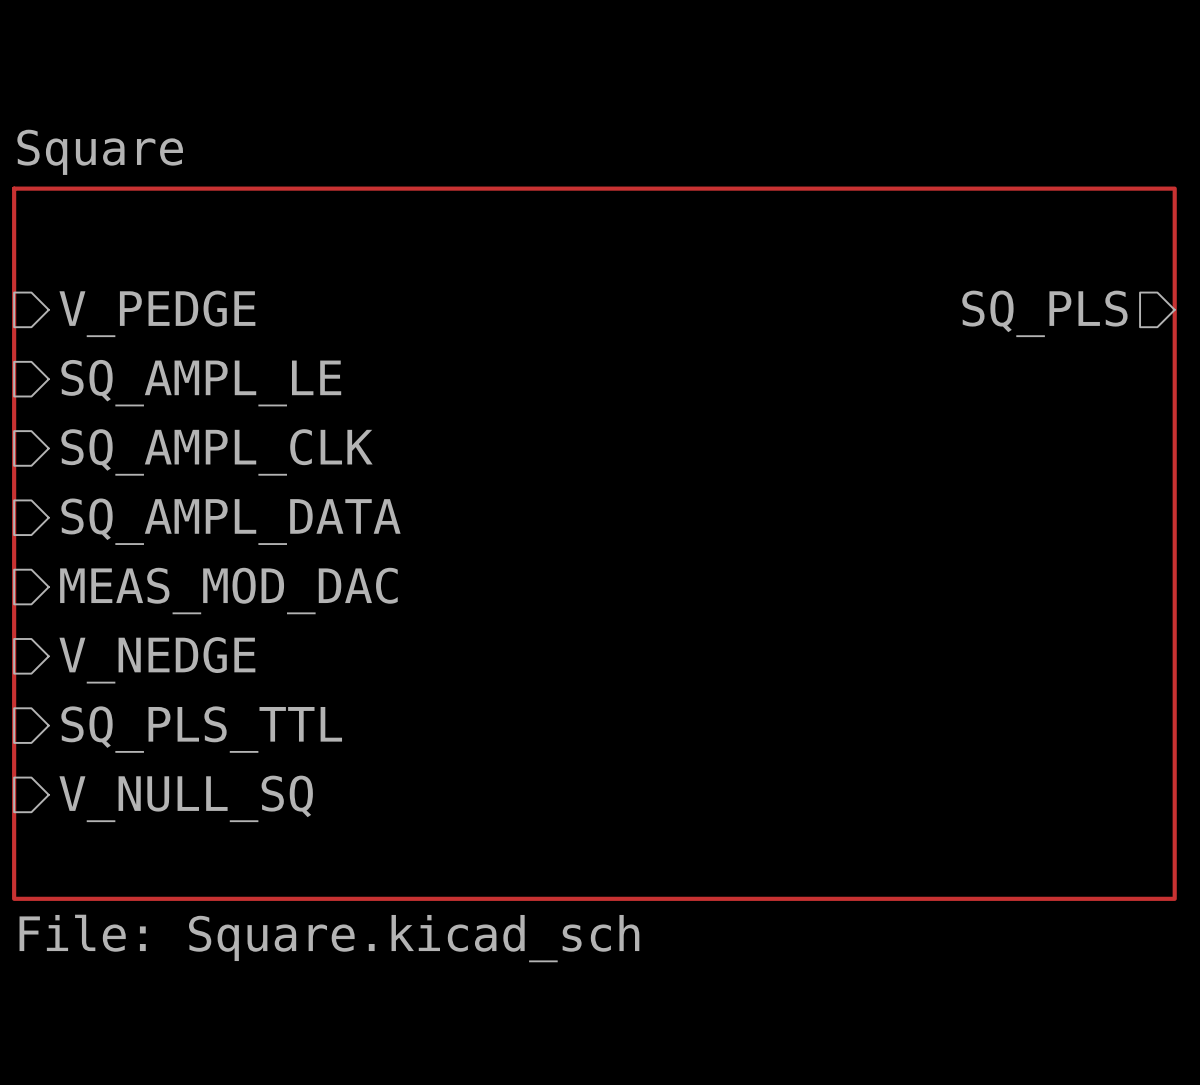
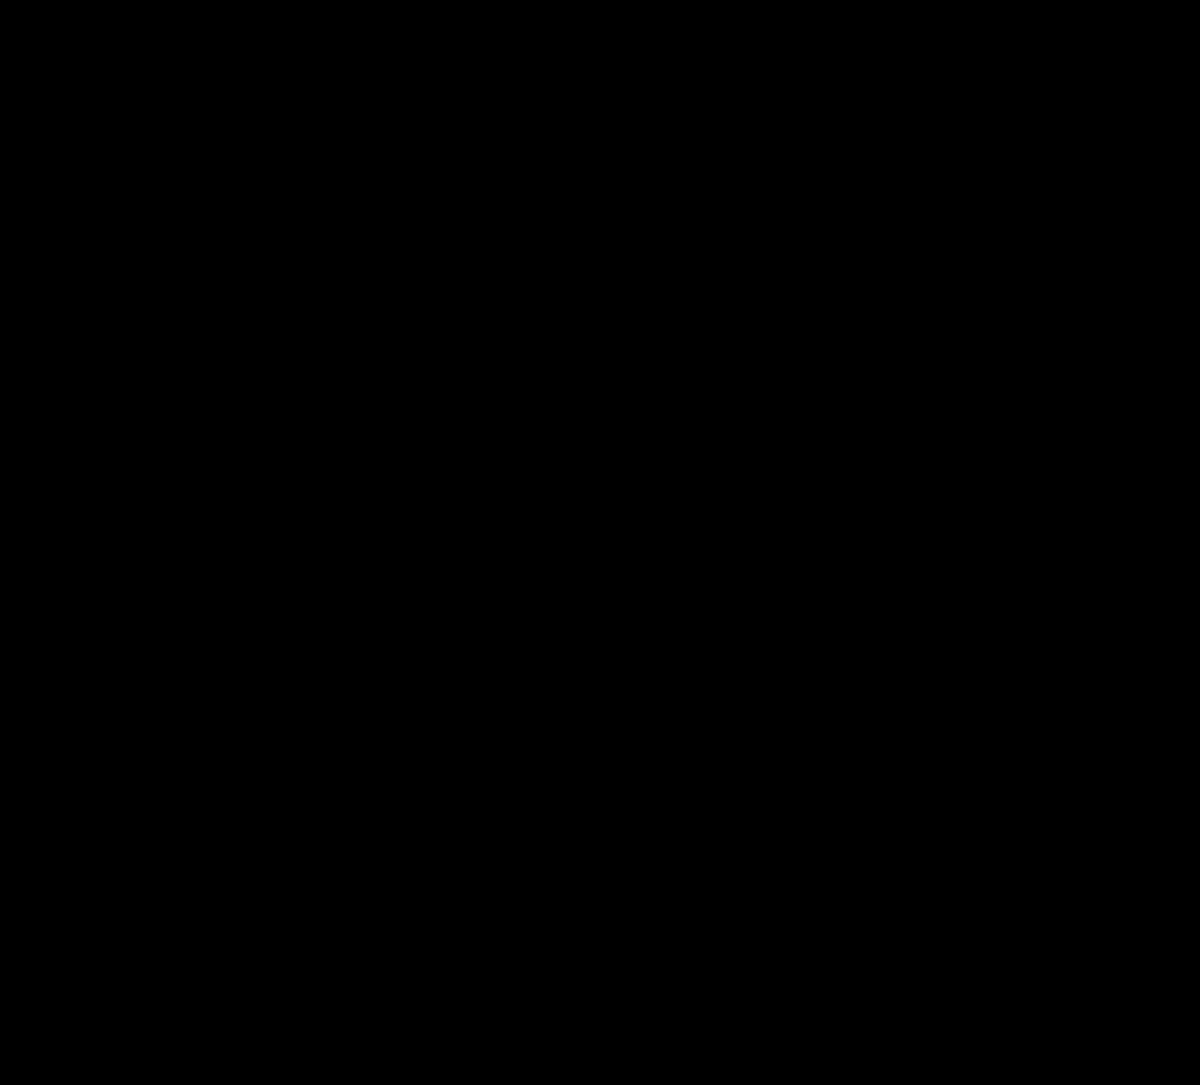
sheet pin: V_PEDGE (157, 313) -> none
sheet pin: SQ_PLS (1044, 313) -> none
sheet pin: SQ_AMPL_LE (201, 383) -> none
sheet pin: SQ_AMPL_CLK (217, 452) -> none
sheet pin: SQ_AMPL_DATA (230, 521) -> none
sheet Square: File: Square.kicad_sch (594, 543) -> none
sheet pin: MEAS_MOD_DAC (228, 591) -> none
sheet pin: V_NEDGE (157, 660) -> none
sheet pin: SQ_PLS_TTL (201, 729) -> none
sheet pin: V_NULL_SQ (186, 798) -> none

